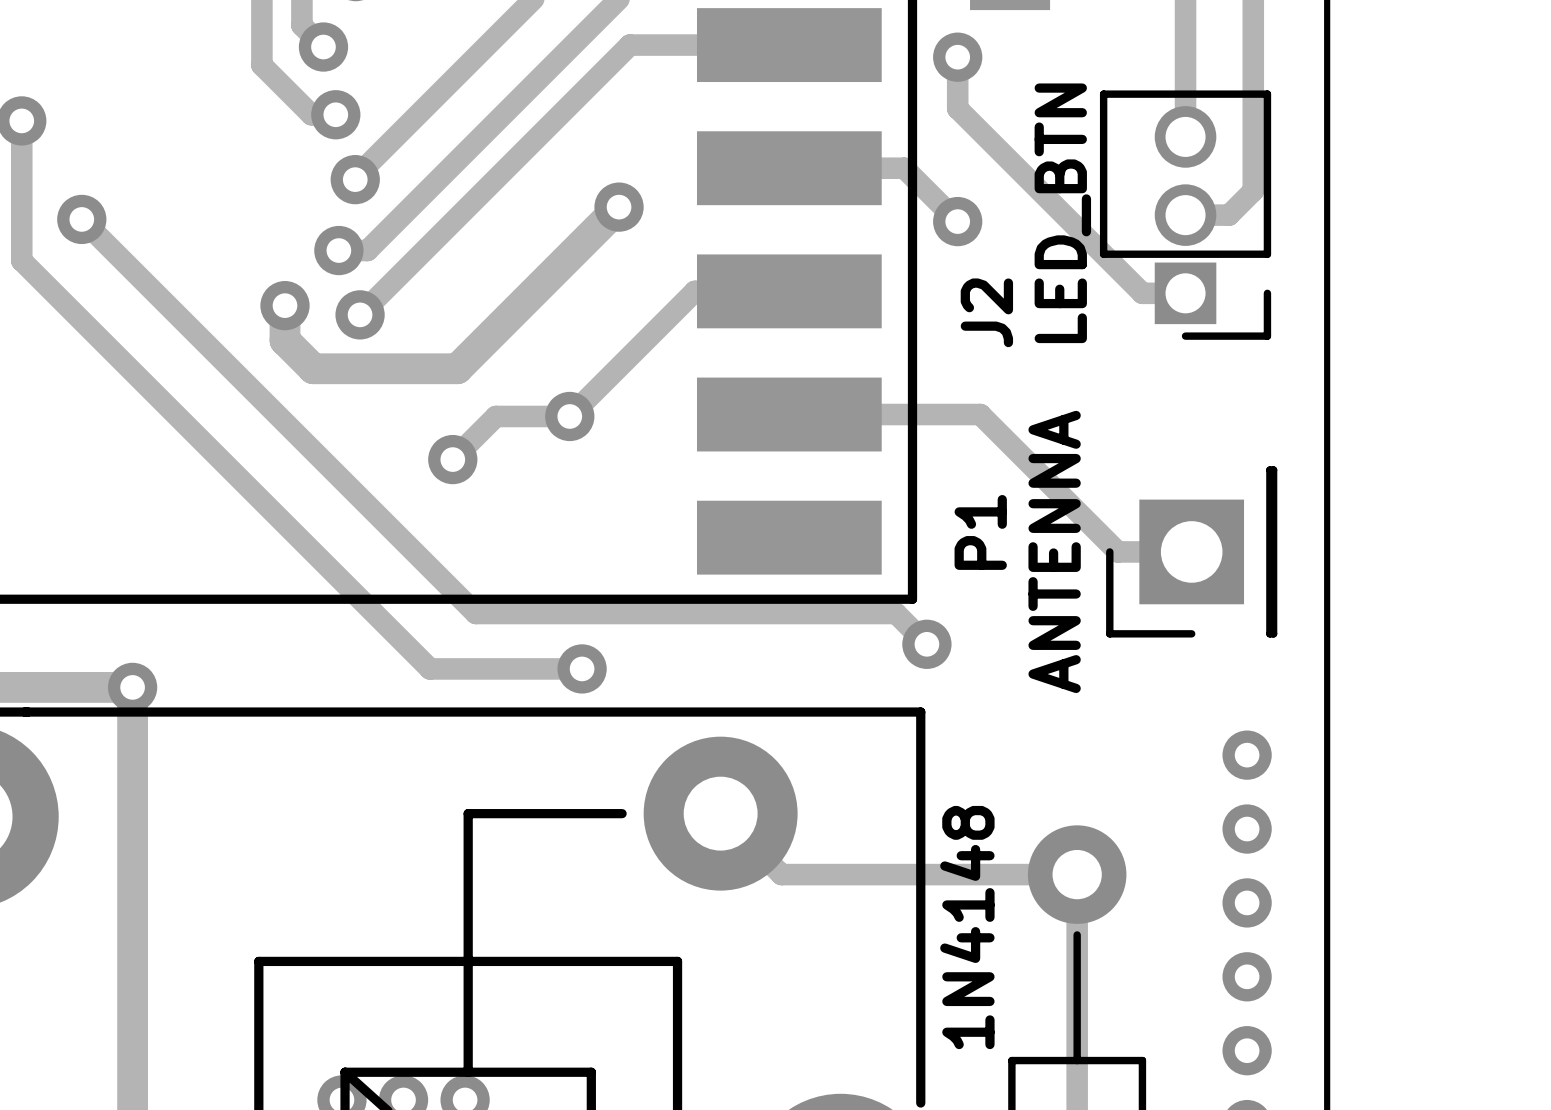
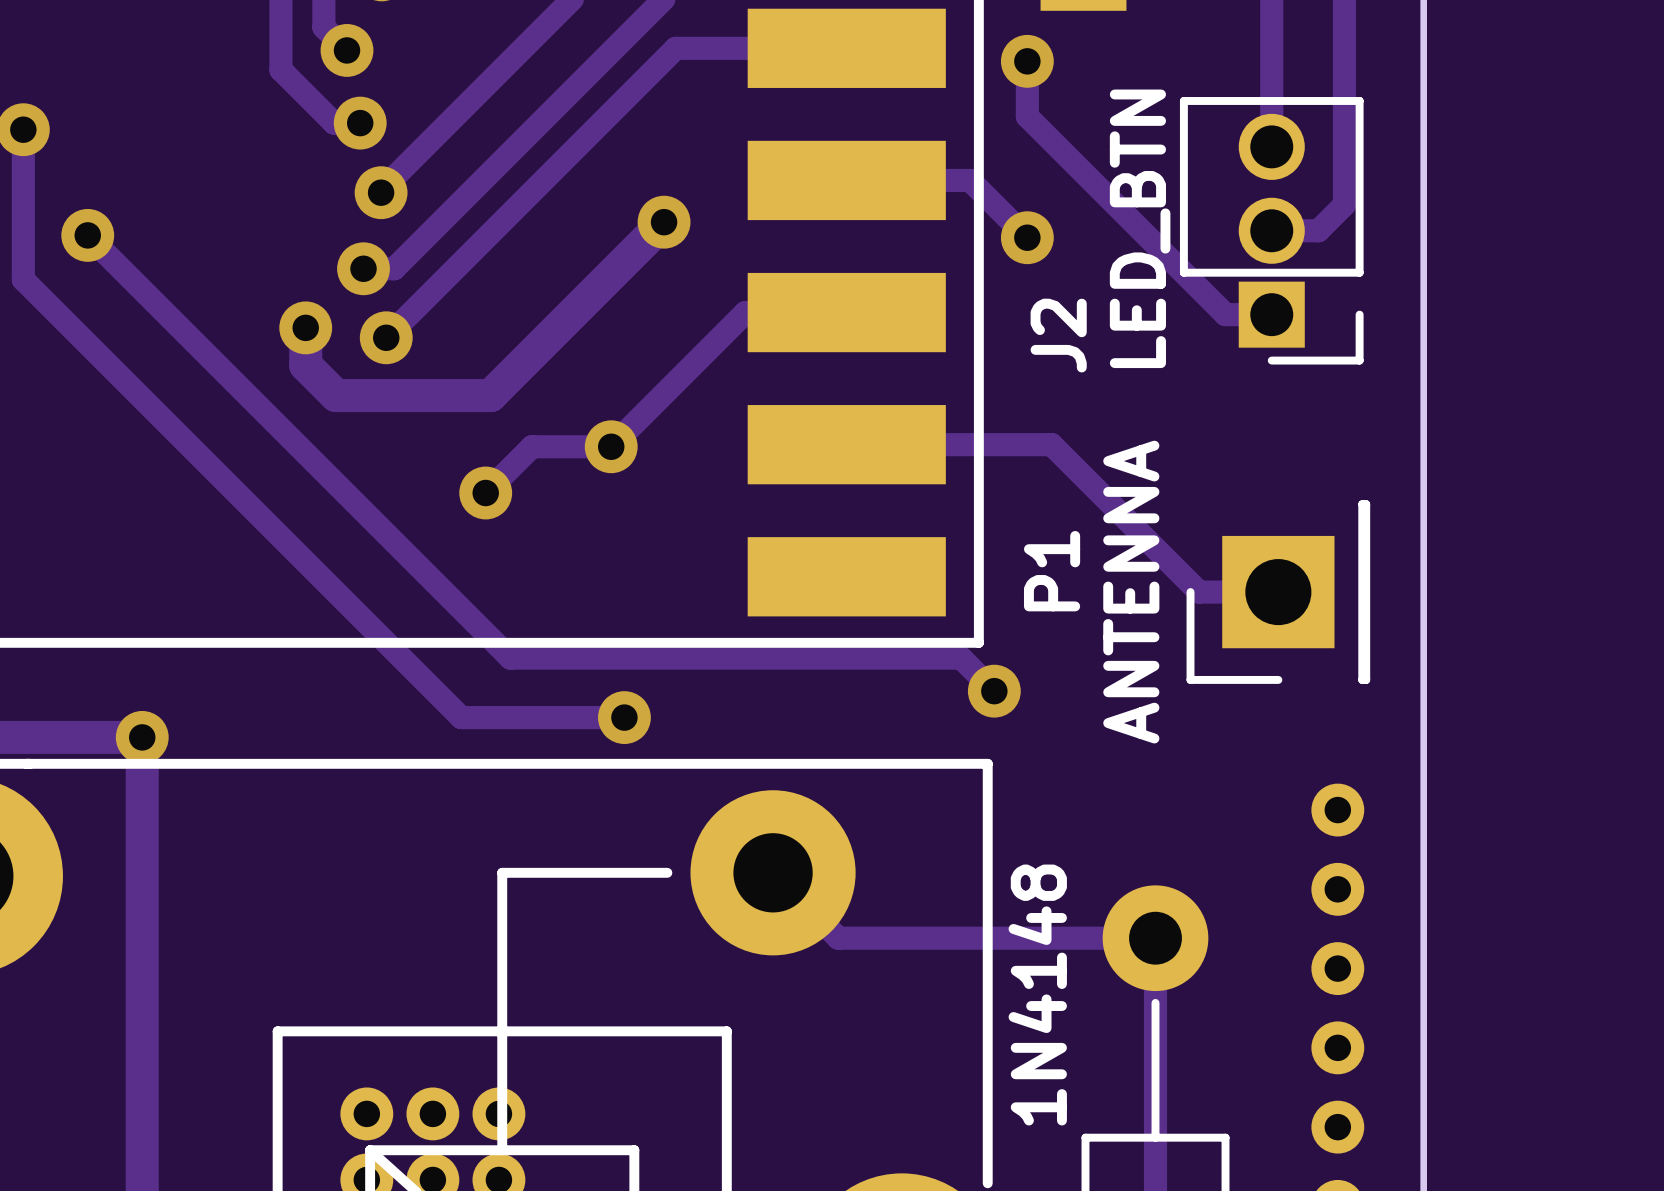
part: none -> (366, 1113)
part: none -> (432, 1113)
part: none -> (498, 1113)

